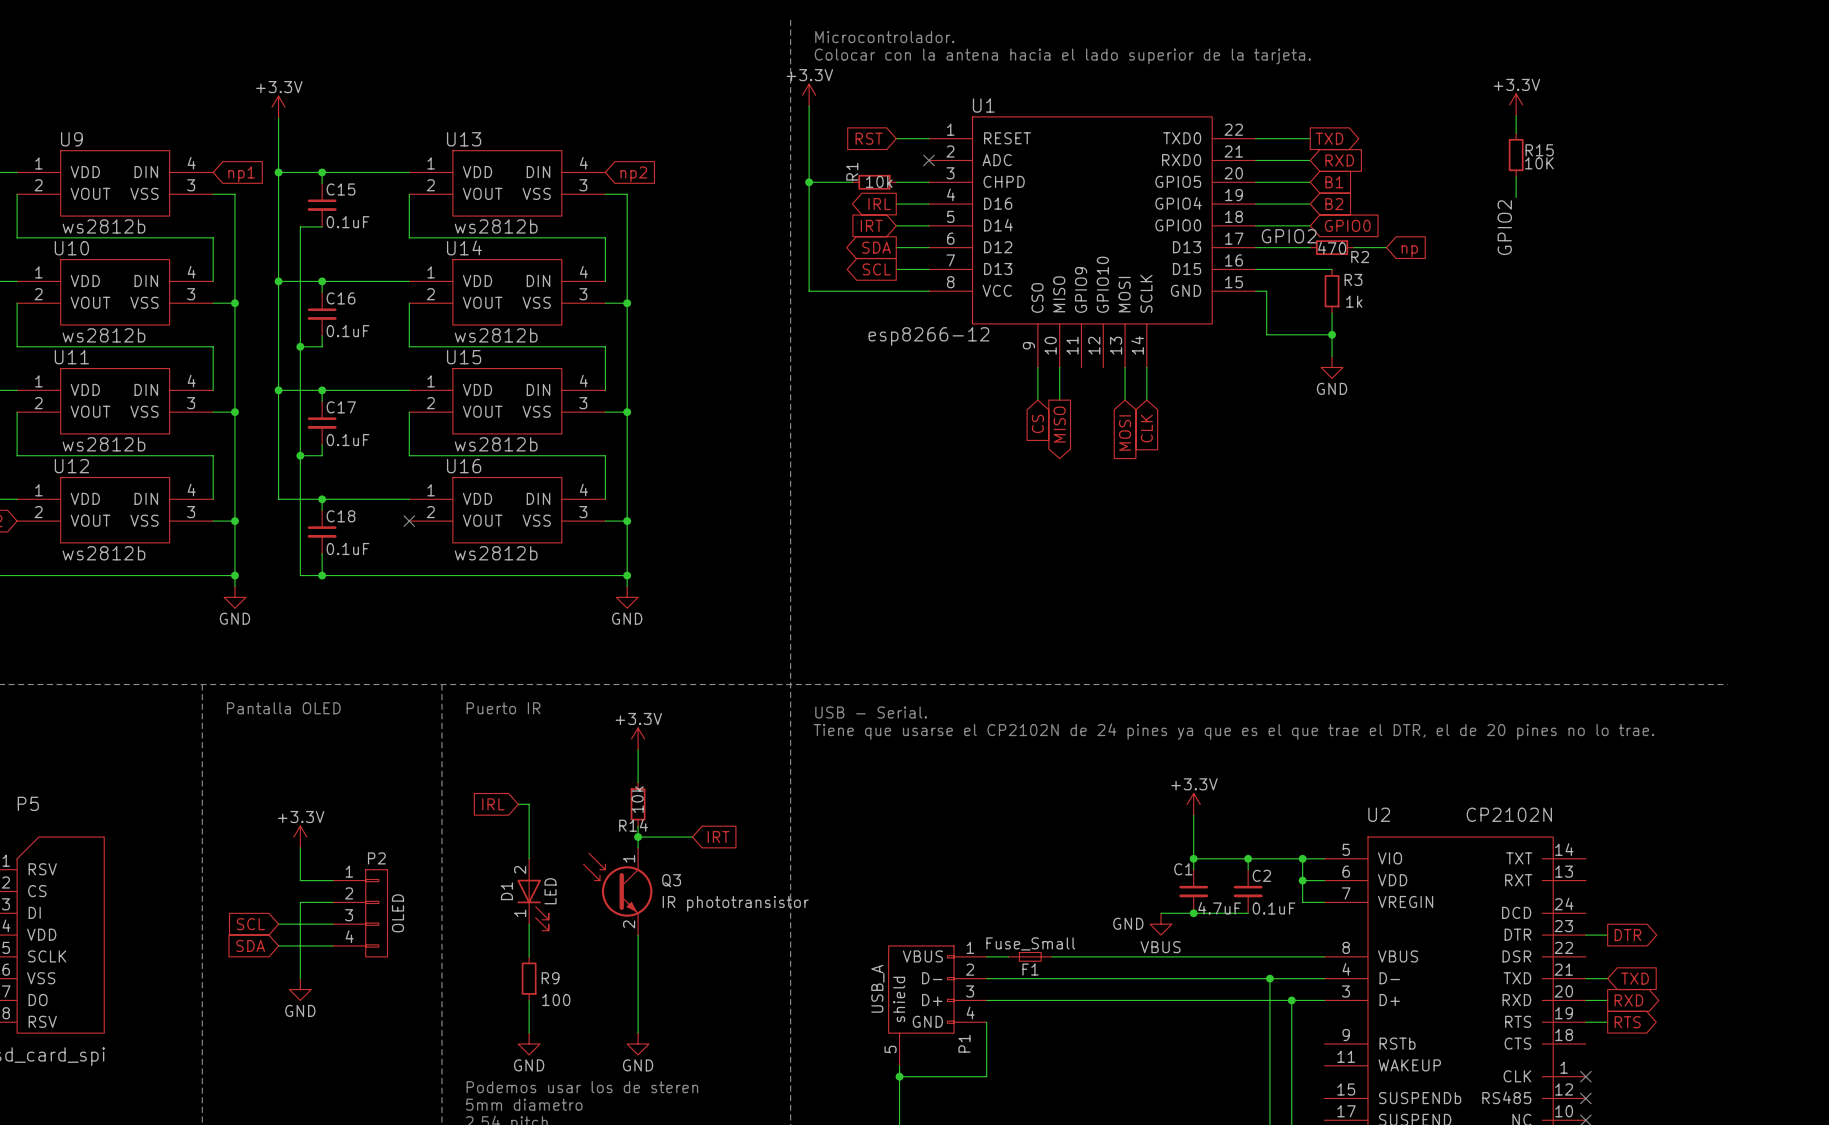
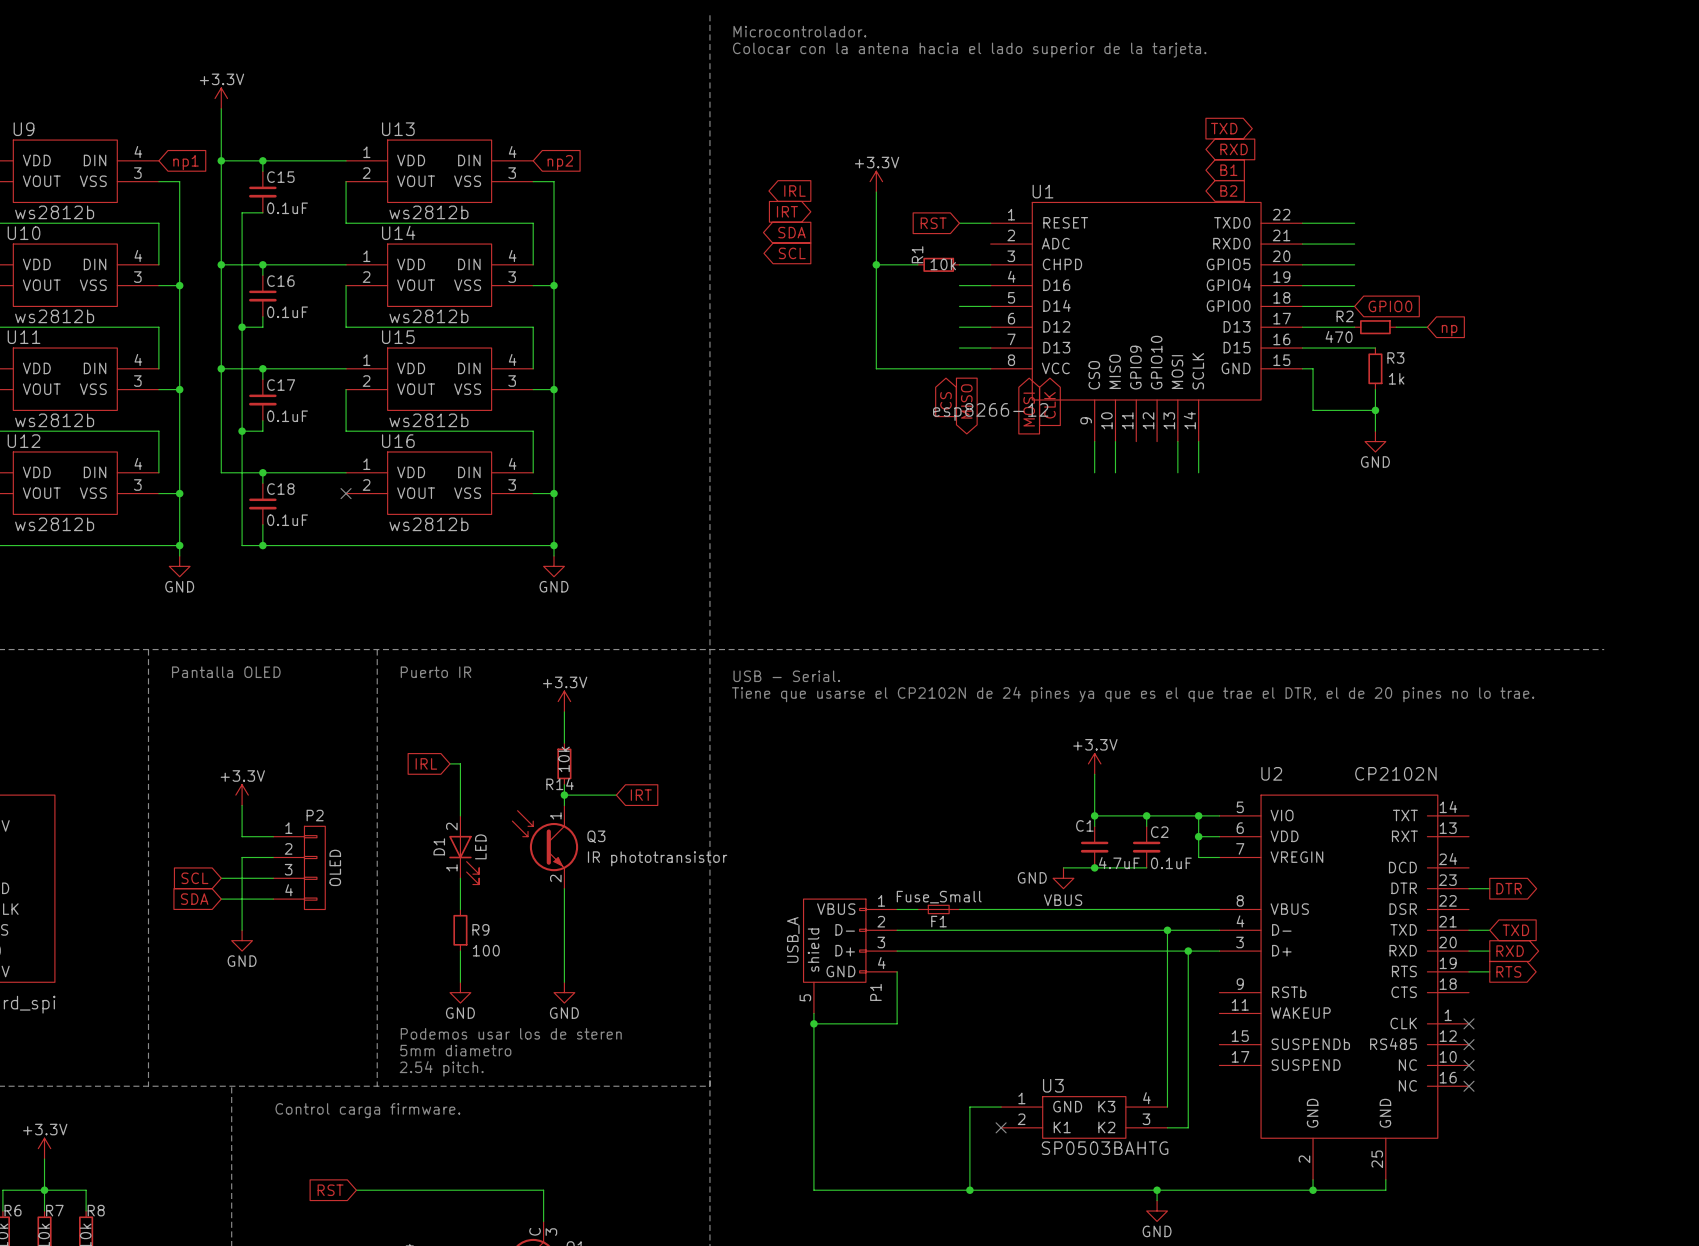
power symbol position: +3.3V (809, 95) -> +3.3V (876, 181)
power symbol: +3.3V (1516, 104) -> none
wire: (809, 106) (809, 291) (928, 291) -> (876, 192) (876, 368) (990, 368)
wire: (1516, 115) (1516, 133) -> none
global label position: RST (869, 138) -> RST (933, 223)
wire: (896, 138) (928, 138) -> (959, 223) (990, 223)
wire: (1255, 138) (1310, 138) -> (1302, 223) (1354, 223)
R15: 10K (1516, 155) -> none
no-connect mark: (928, 160) -> none
wire: (1255, 160) (1310, 160) -> (1302, 244) (1354, 244)
wire: (1516, 176) (1516, 197) -> none
wire: (809, 182) (852, 182) -> (876, 264) (917, 264)
junction: (809, 182) -> none
R1 position: (874, 182) -> (938, 264)
wire: (896, 182) (928, 182) -> (959, 264) (990, 264)
wire: (1255, 182) (1310, 182) -> (1302, 264) (1354, 264)
wire: (896, 204) (928, 204) -> (959, 285) (990, 285)
wire: (1255, 204) (1310, 204) -> (1302, 285) (1354, 285)
wire: (896, 225) (928, 225) -> (959, 306) (990, 306)
wire: (1255, 225) (1310, 225) -> (1302, 306) (1354, 306)
global label position: GPIO0 (1347, 225) -> GPIO0 (1390, 306)
label: GPIO2 (1504, 227) -> none
label: GPIO2 (1289, 236) -> none
U1 position: (1092, 242) -> (1146, 322)
wire: (896, 247) (928, 247) -> (959, 327) (990, 327)
wire: (1255, 247) (1310, 247) -> (1302, 327) (1354, 327)
R2 position: (1332, 247) -> (1375, 327)
wire: (1353, 247) (1386, 247) -> (1396, 327) (1427, 327)
R2 value position: 470 (1332, 248) -> 470 (1339, 336)
global label position: np (1409, 251) -> np (1449, 330)
R2 name position: R2 (1360, 257) -> R2 (1345, 316)
wire: (896, 269) (928, 269) -> (959, 348) (990, 348)
wire: (1255, 269) (1332, 269) -> (1302, 348) (1375, 348)
junction: none -> (876, 264)
wire: (1255, 291) (1266, 291) (1266, 334) (1332, 334) -> (1302, 368) (1313, 368) (1313, 410) (1375, 410)
R3 position: (1332, 291) -> (1375, 368)
wire: (1332, 313) (1332, 356) -> (1375, 389) (1375, 431)
junction: (1332, 334) -> none
wire: (1037, 367) (1037, 400) -> (1094, 441) (1094, 472)
wire: (1059, 367) (1059, 400) -> (1115, 441) (1115, 472)
wire: (1125, 367) (1125, 400) -> (1177, 441) (1177, 472)
wire: (1146, 367) (1146, 400) -> (1198, 441) (1198, 472)
power symbol position: GND (1332, 367) -> GND (1375, 441)
junction: none -> (1375, 410)

